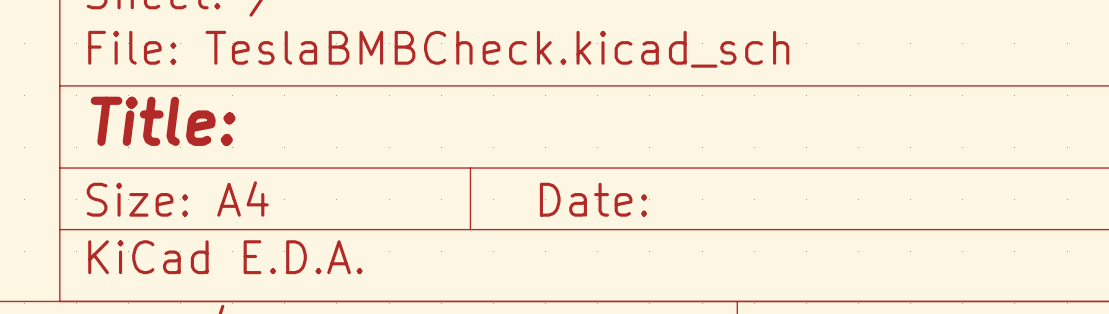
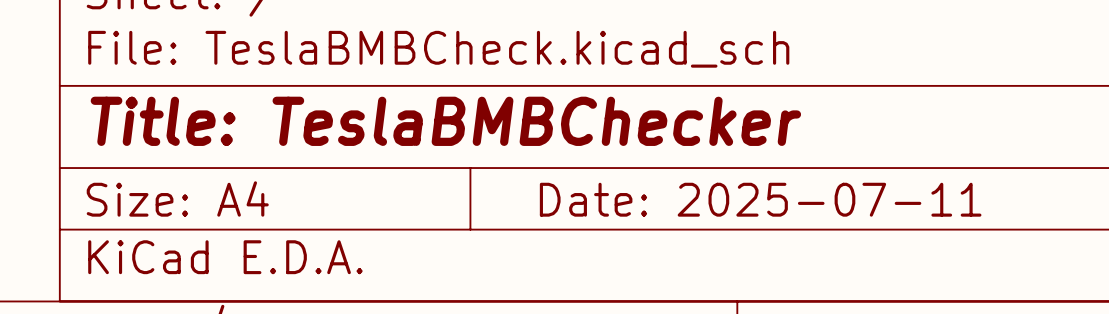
title block: Title: (163, 121) -> Title: TeslaBMBChecker (445, 121)
title block: Date: (593, 199) -> Date: 2025-07-11 (760, 199)

